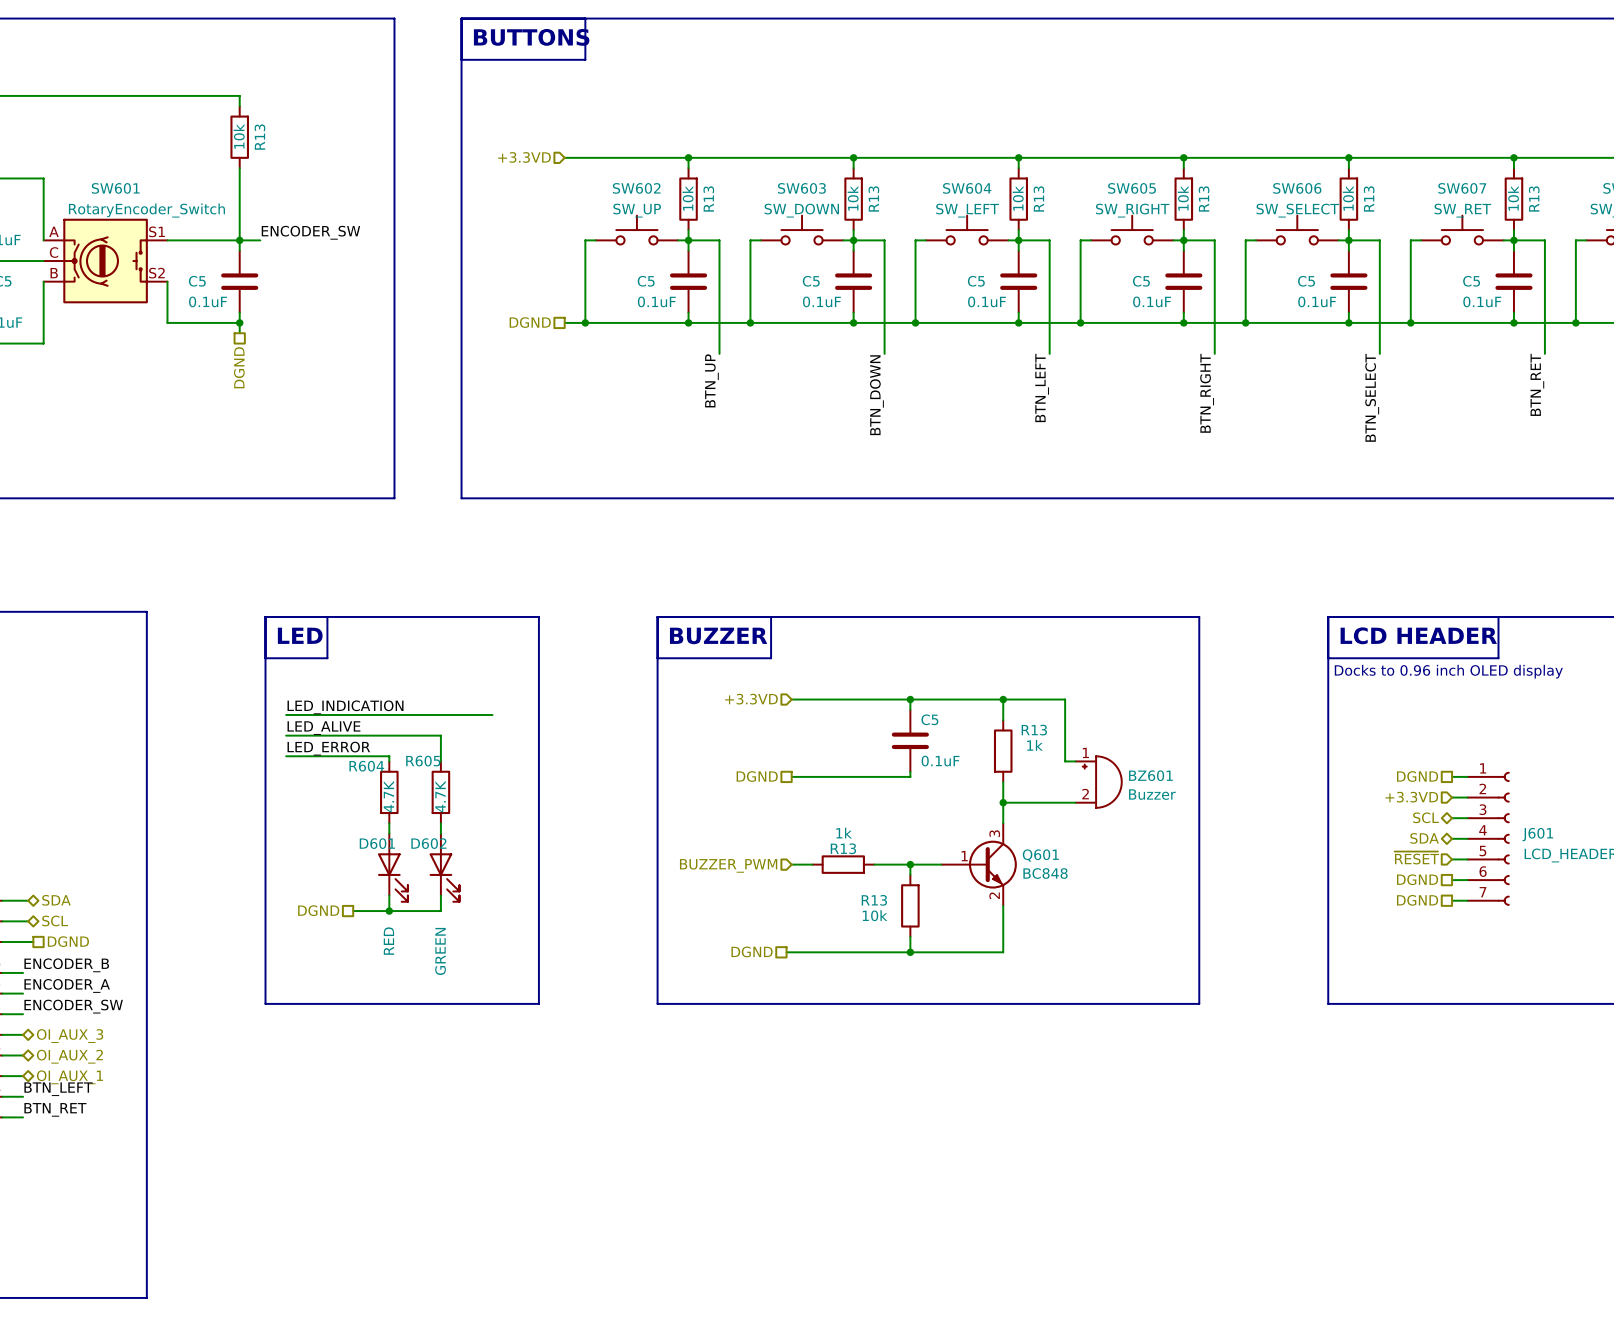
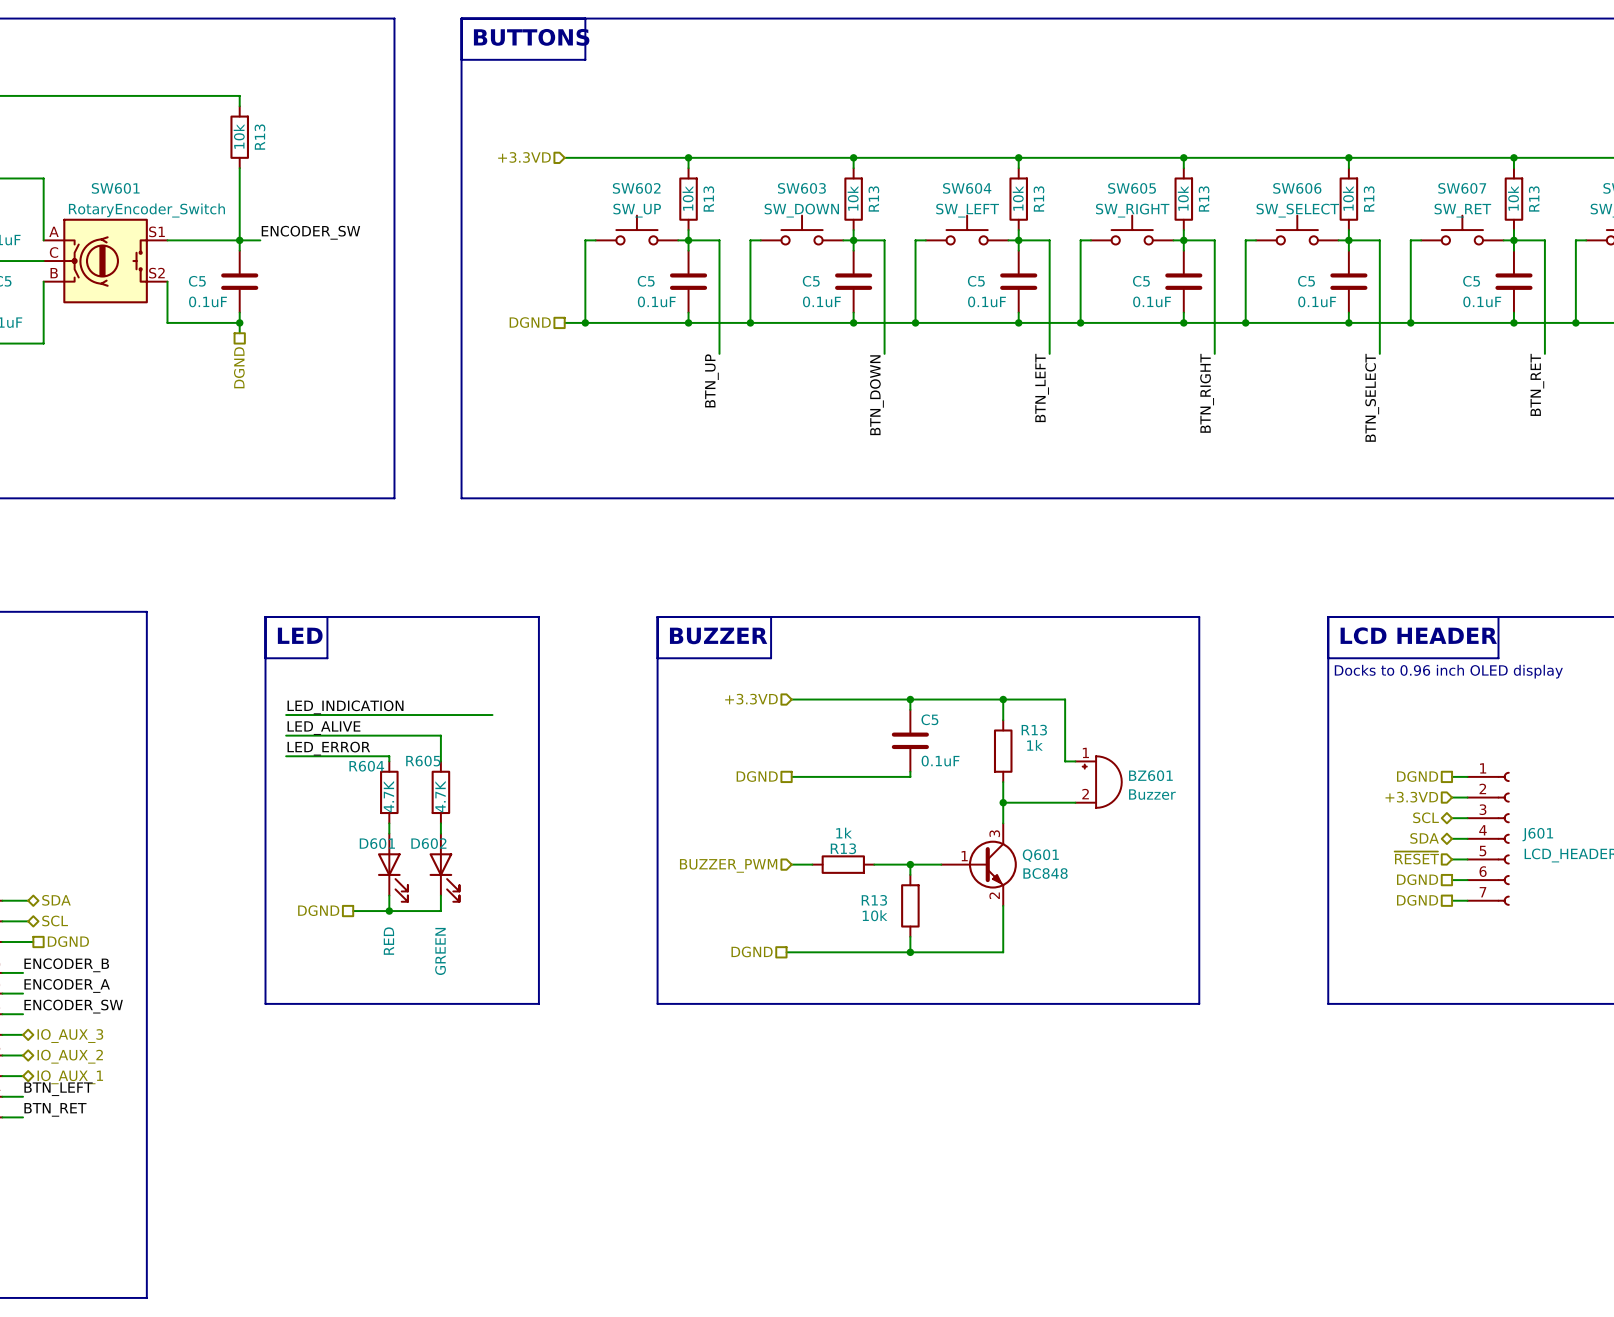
hierarchical label: OI_AUX_3 (70, 1036) -> IO_AUX_3 (70, 1036)
hierarchical label: OI_AUX_2 (69, 1056) -> IO_AUX_2 (70, 1056)
hierarchical label: OI_AUX_1 (69, 1077) -> IO_AUX_1 (70, 1077)

